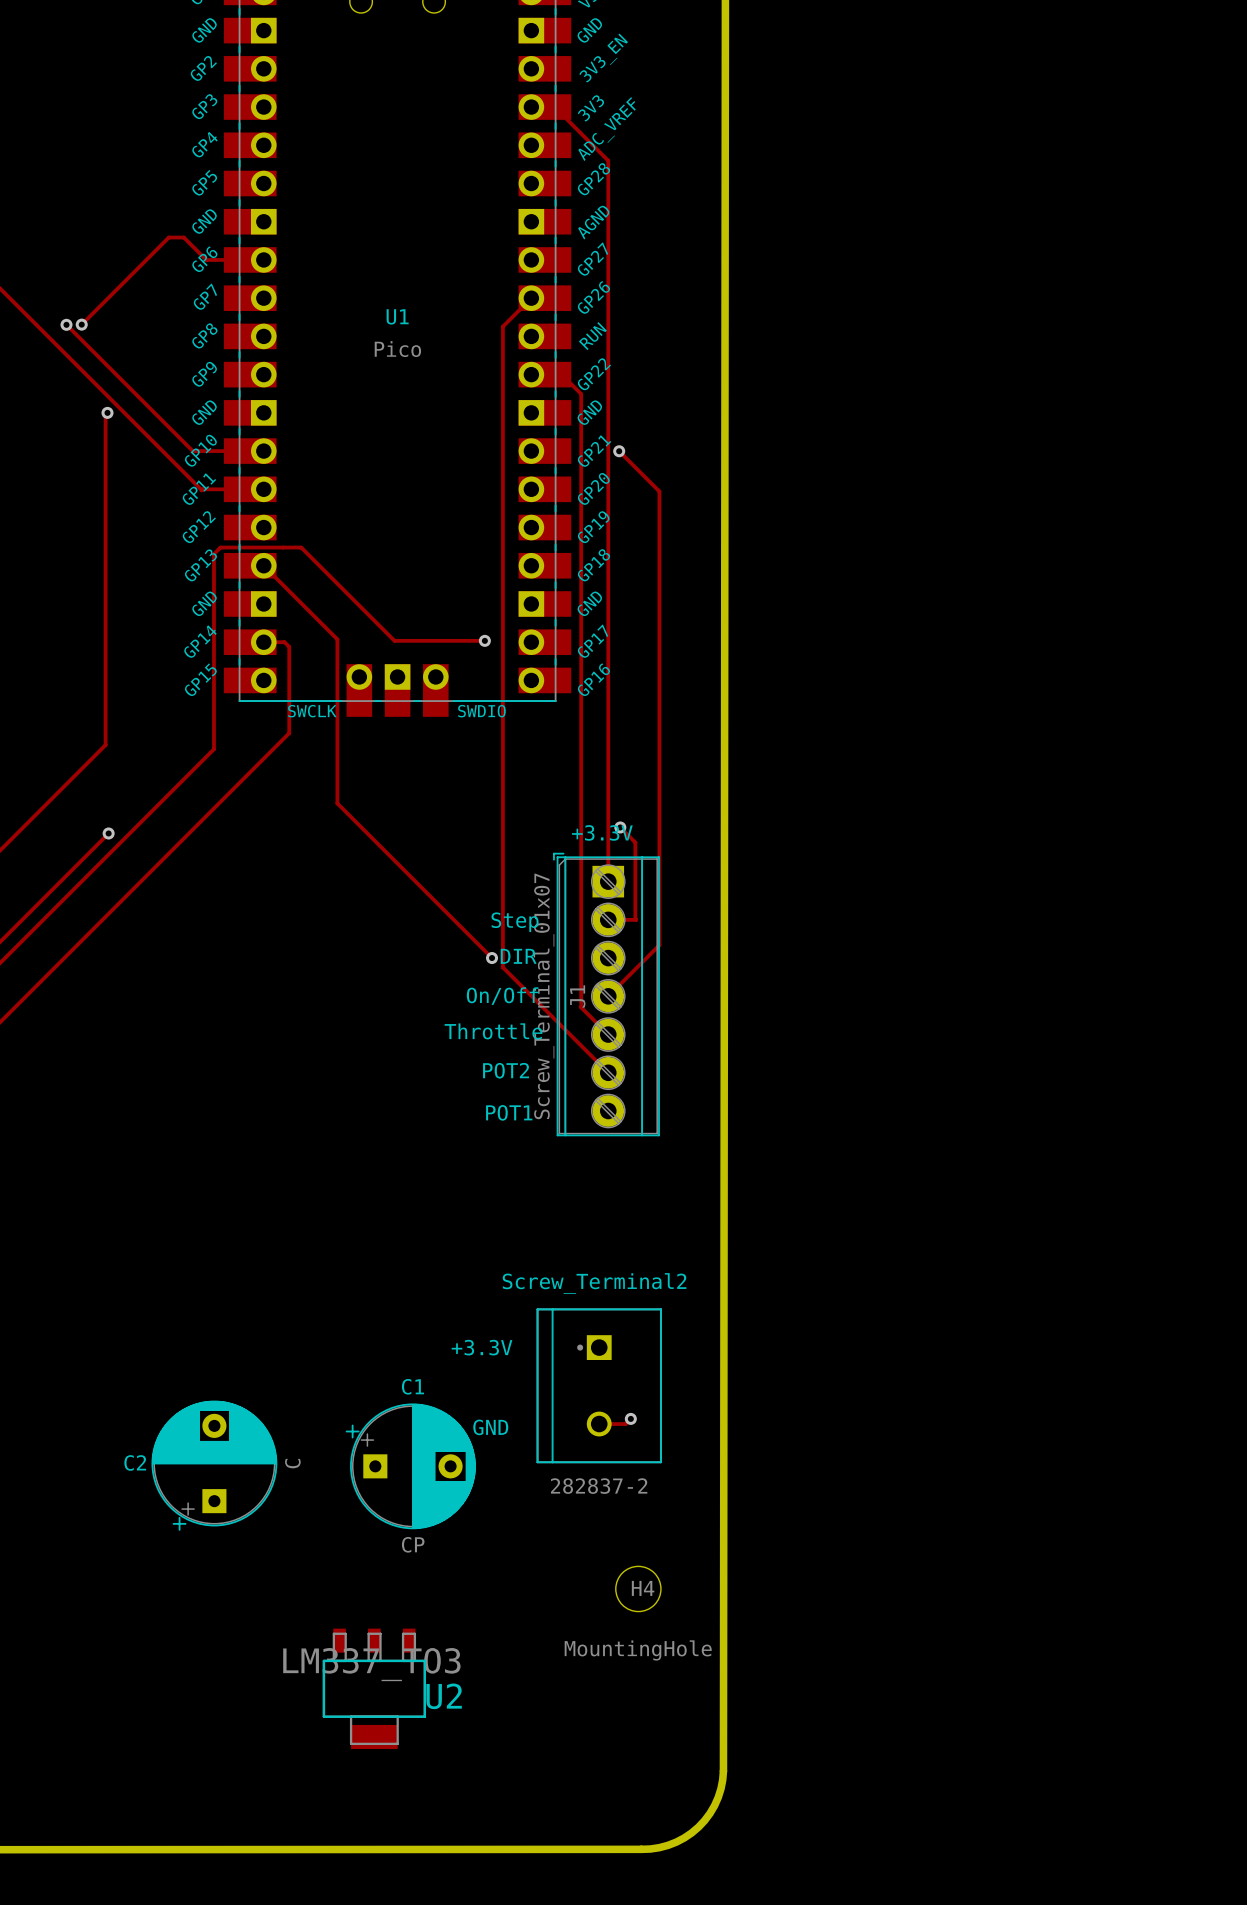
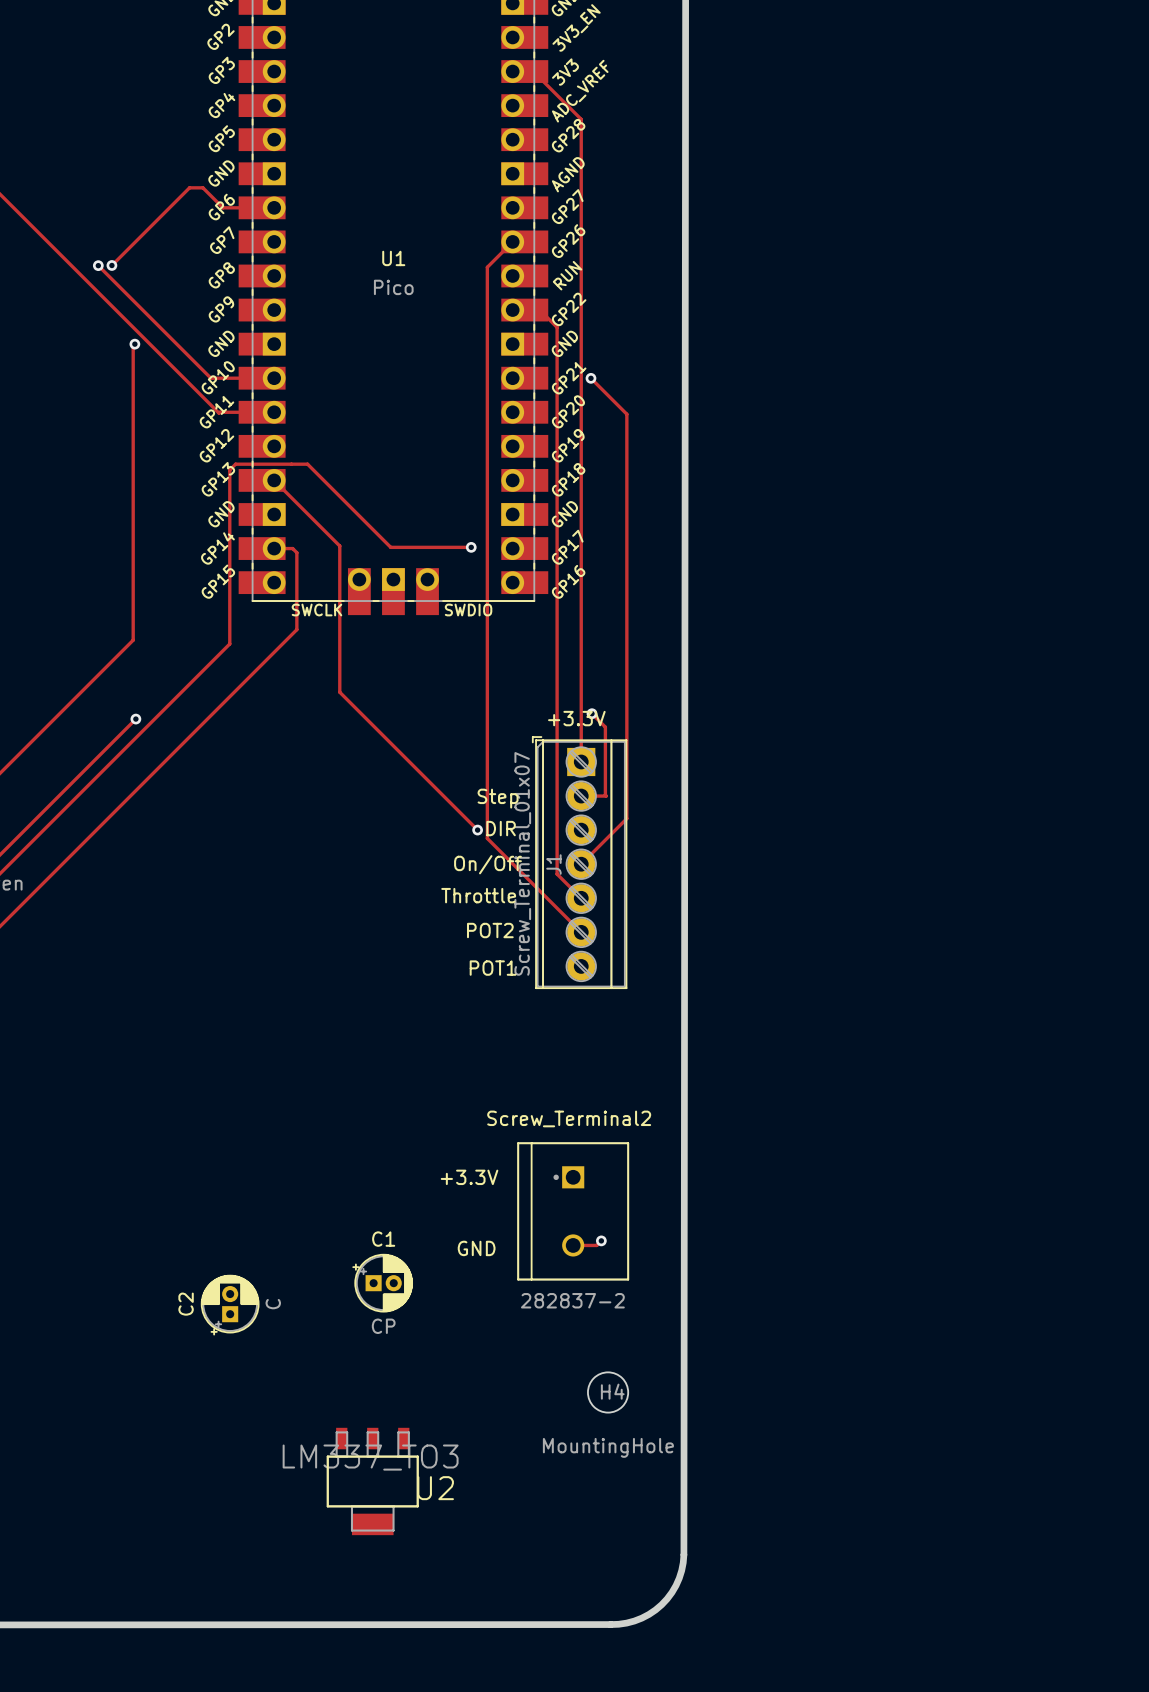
C1 name position: C1 (412, 1386) -> C1 (383, 1239)
C2 footprint: [151, 1400, 278, 1531] -> [200, 1274, 260, 1336]
C1 footprint: [345, 1403, 476, 1530] -> [352, 1253, 413, 1313]
C2 name position: C2 (135, 1462) -> C2 (186, 1304)
C2 value position: C (292, 1463) -> C (273, 1304)
C1 value position: CP (413, 1544) -> CP (383, 1326)

